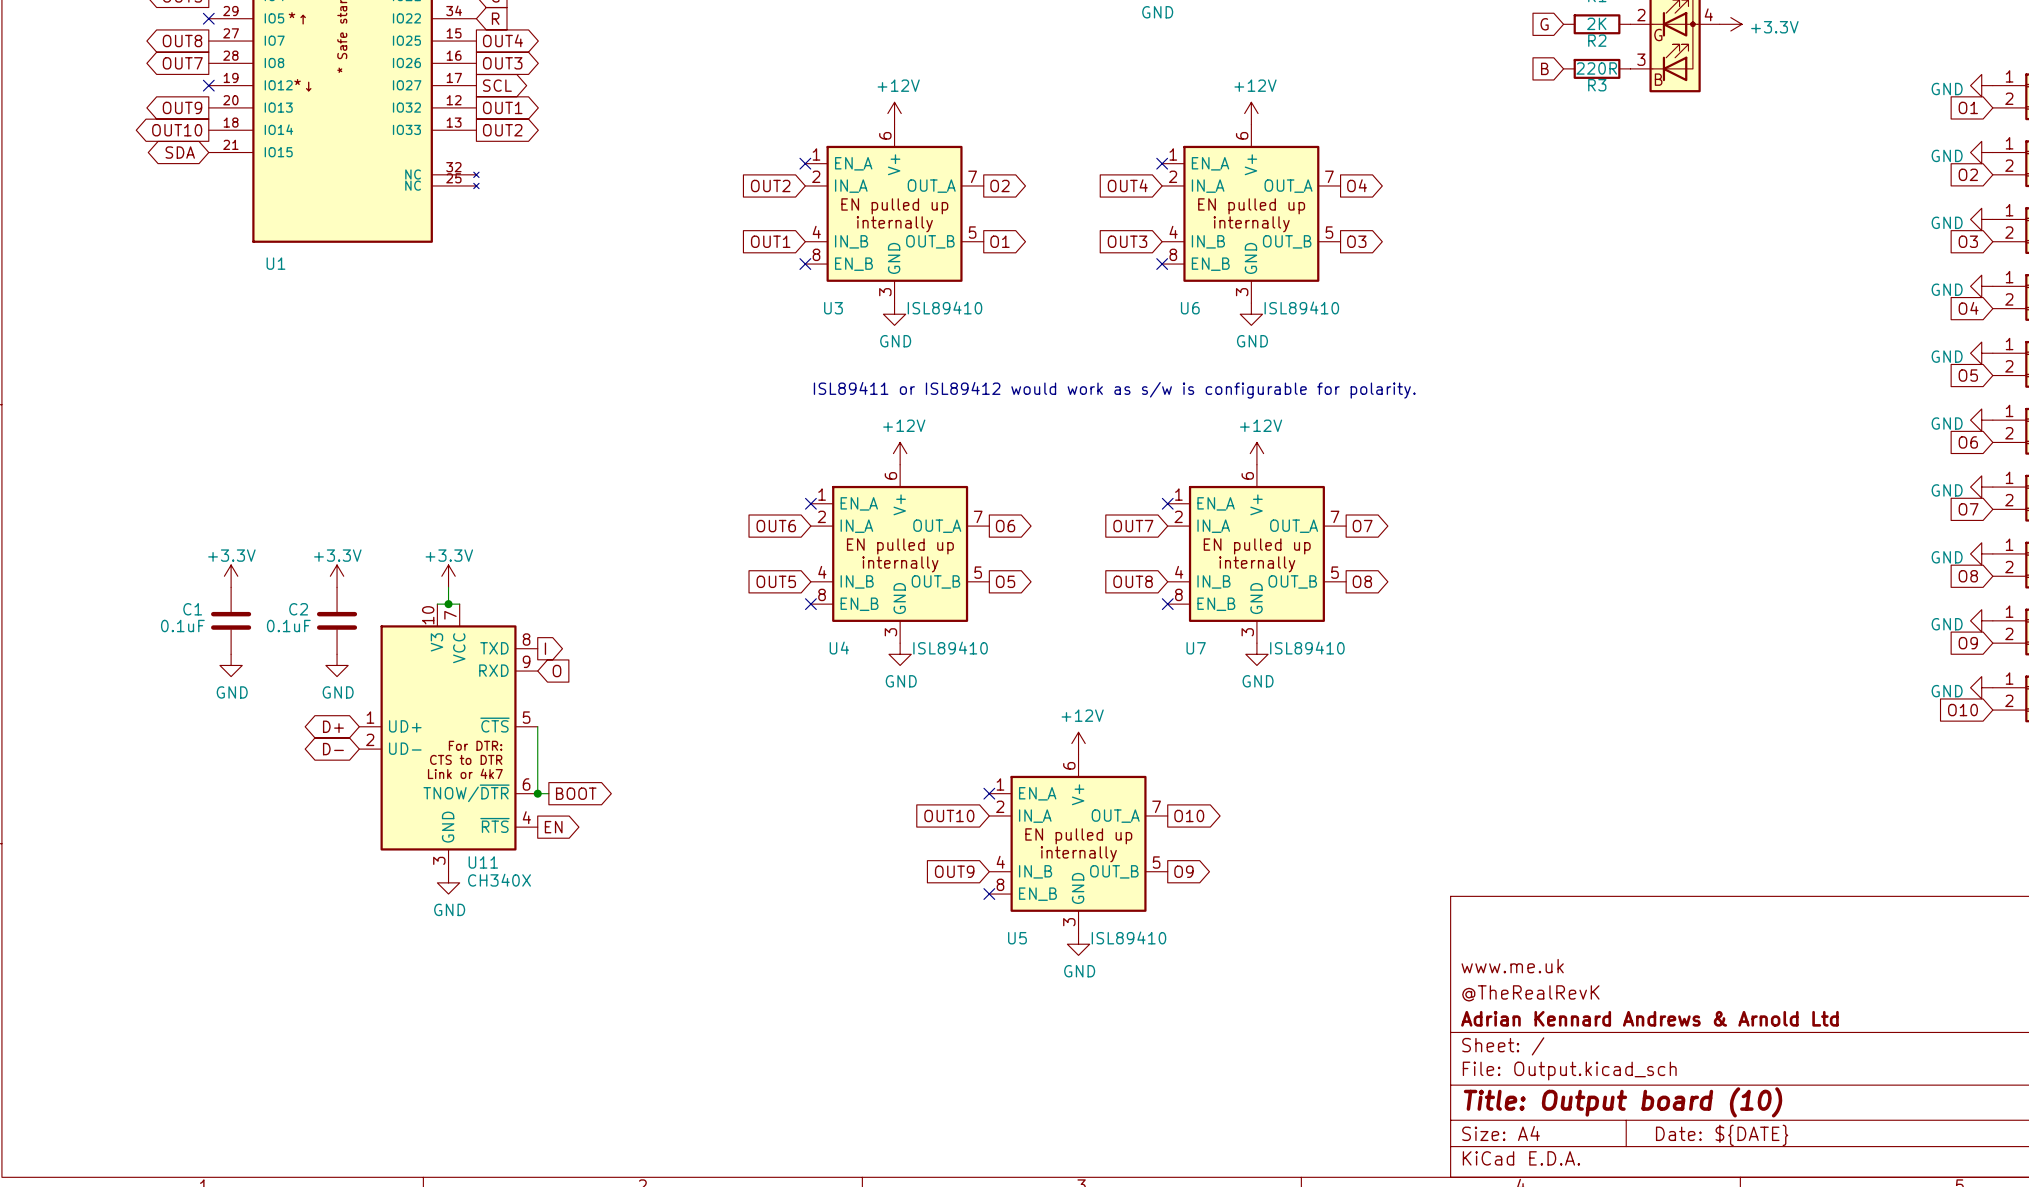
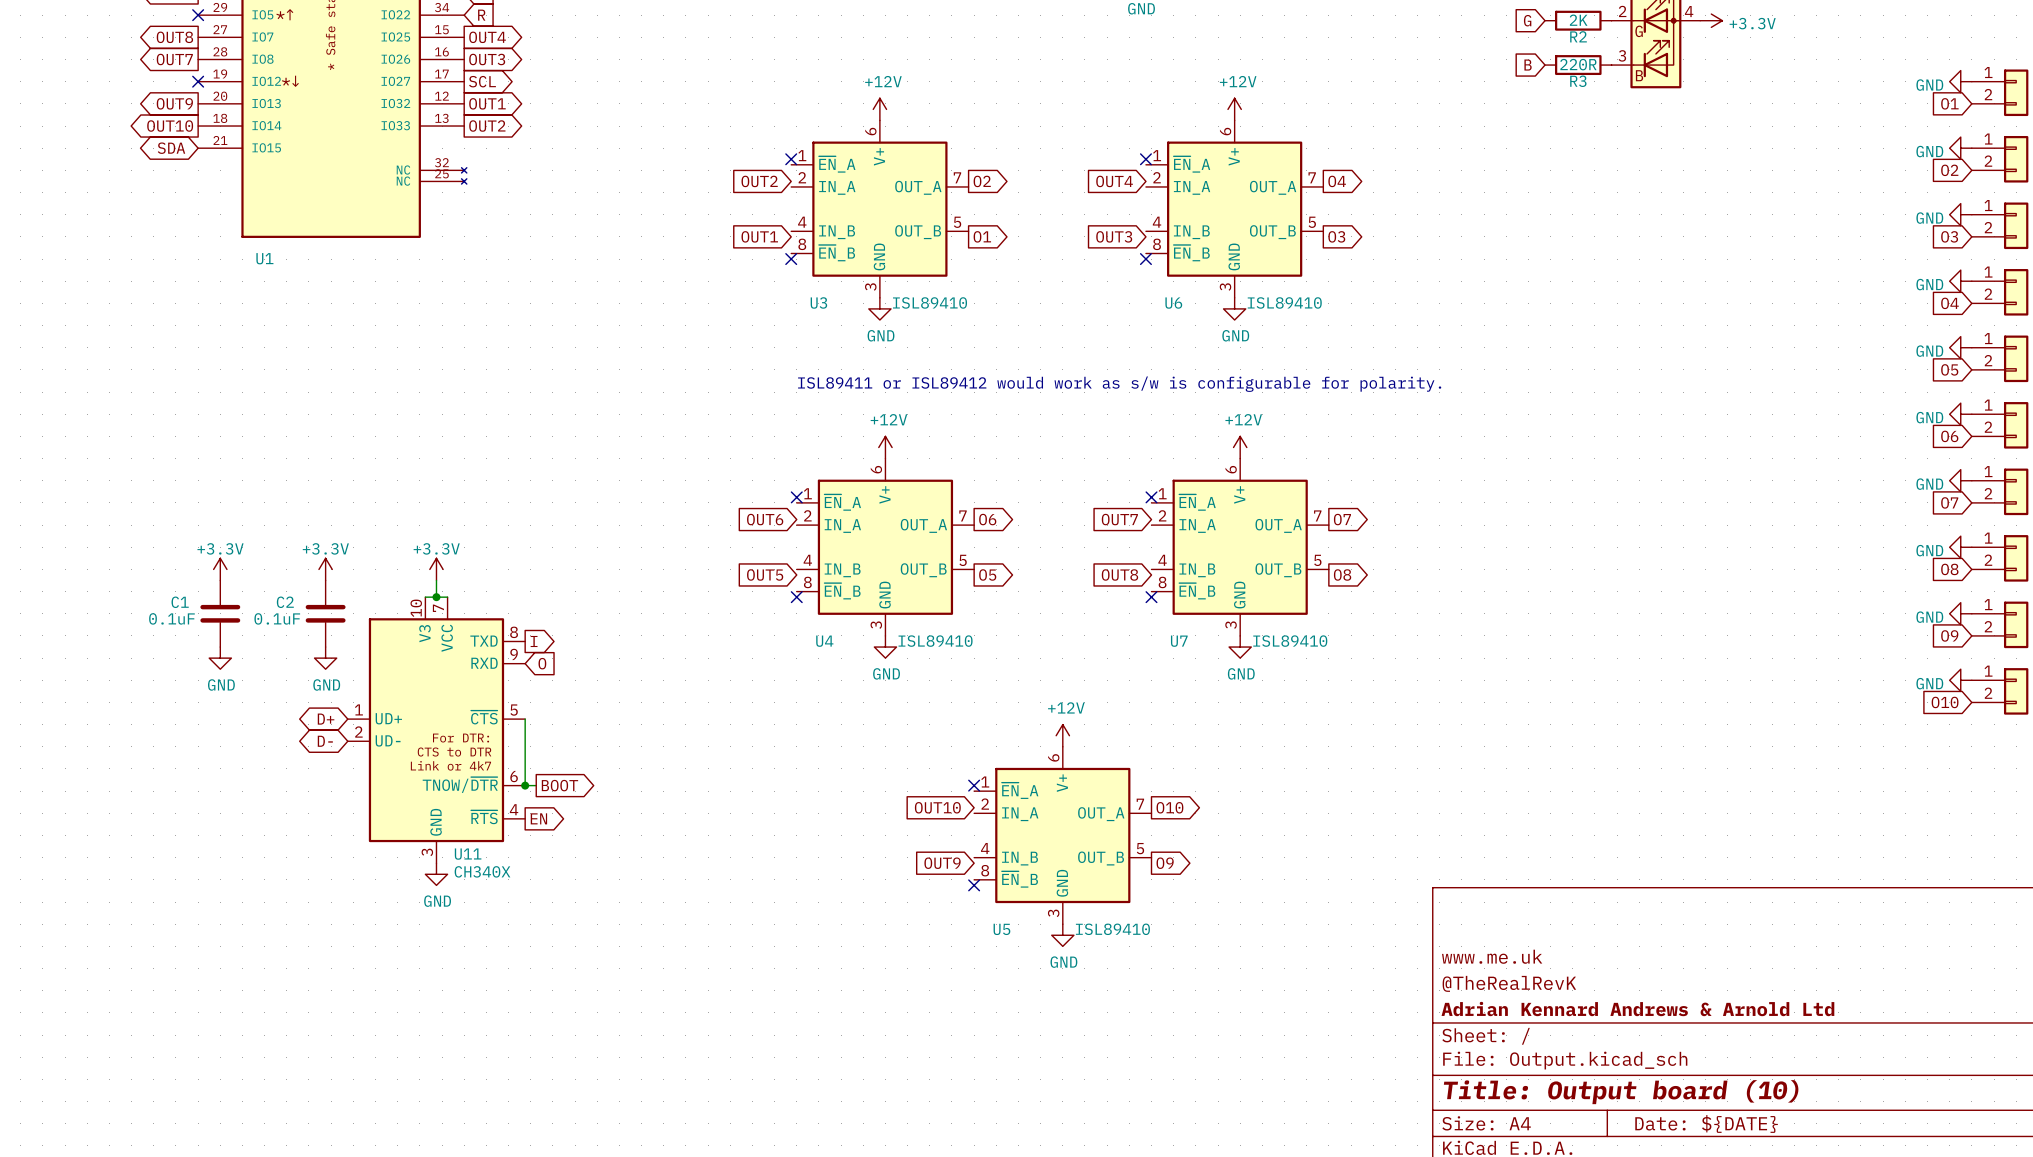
U3 symbol: [805, 124, 984, 304] -> [791, 120, 969, 298]
U6 symbol: [1162, 124, 1341, 304] -> [1145, 120, 1324, 298]
U4 symbol: [810, 464, 990, 644] -> [796, 458, 975, 636]
U7 symbol: [1167, 464, 1347, 644] -> [1151, 458, 1329, 636]
U5 symbol: [989, 754, 1168, 934] -> [974, 746, 1152, 925]

